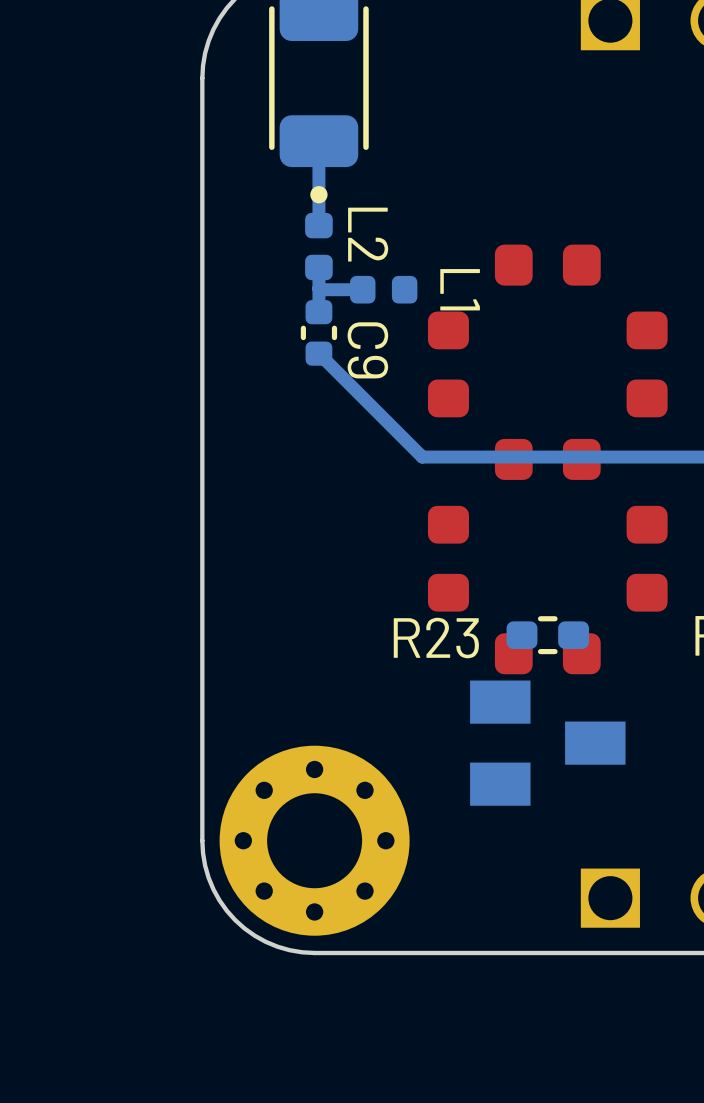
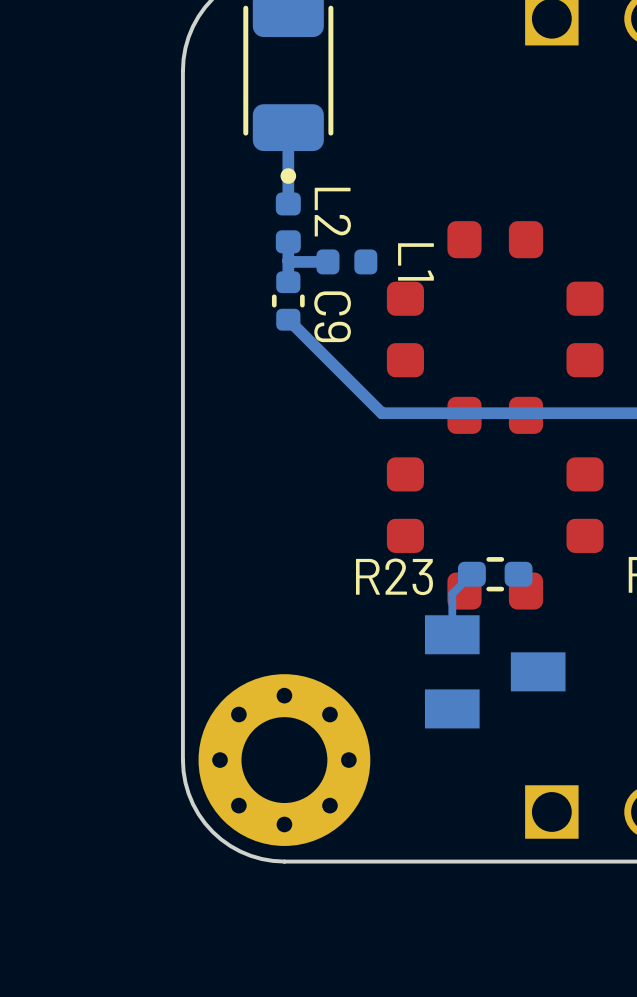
bottom track: none -> (471, 574) (452, 593) (452, 634)

